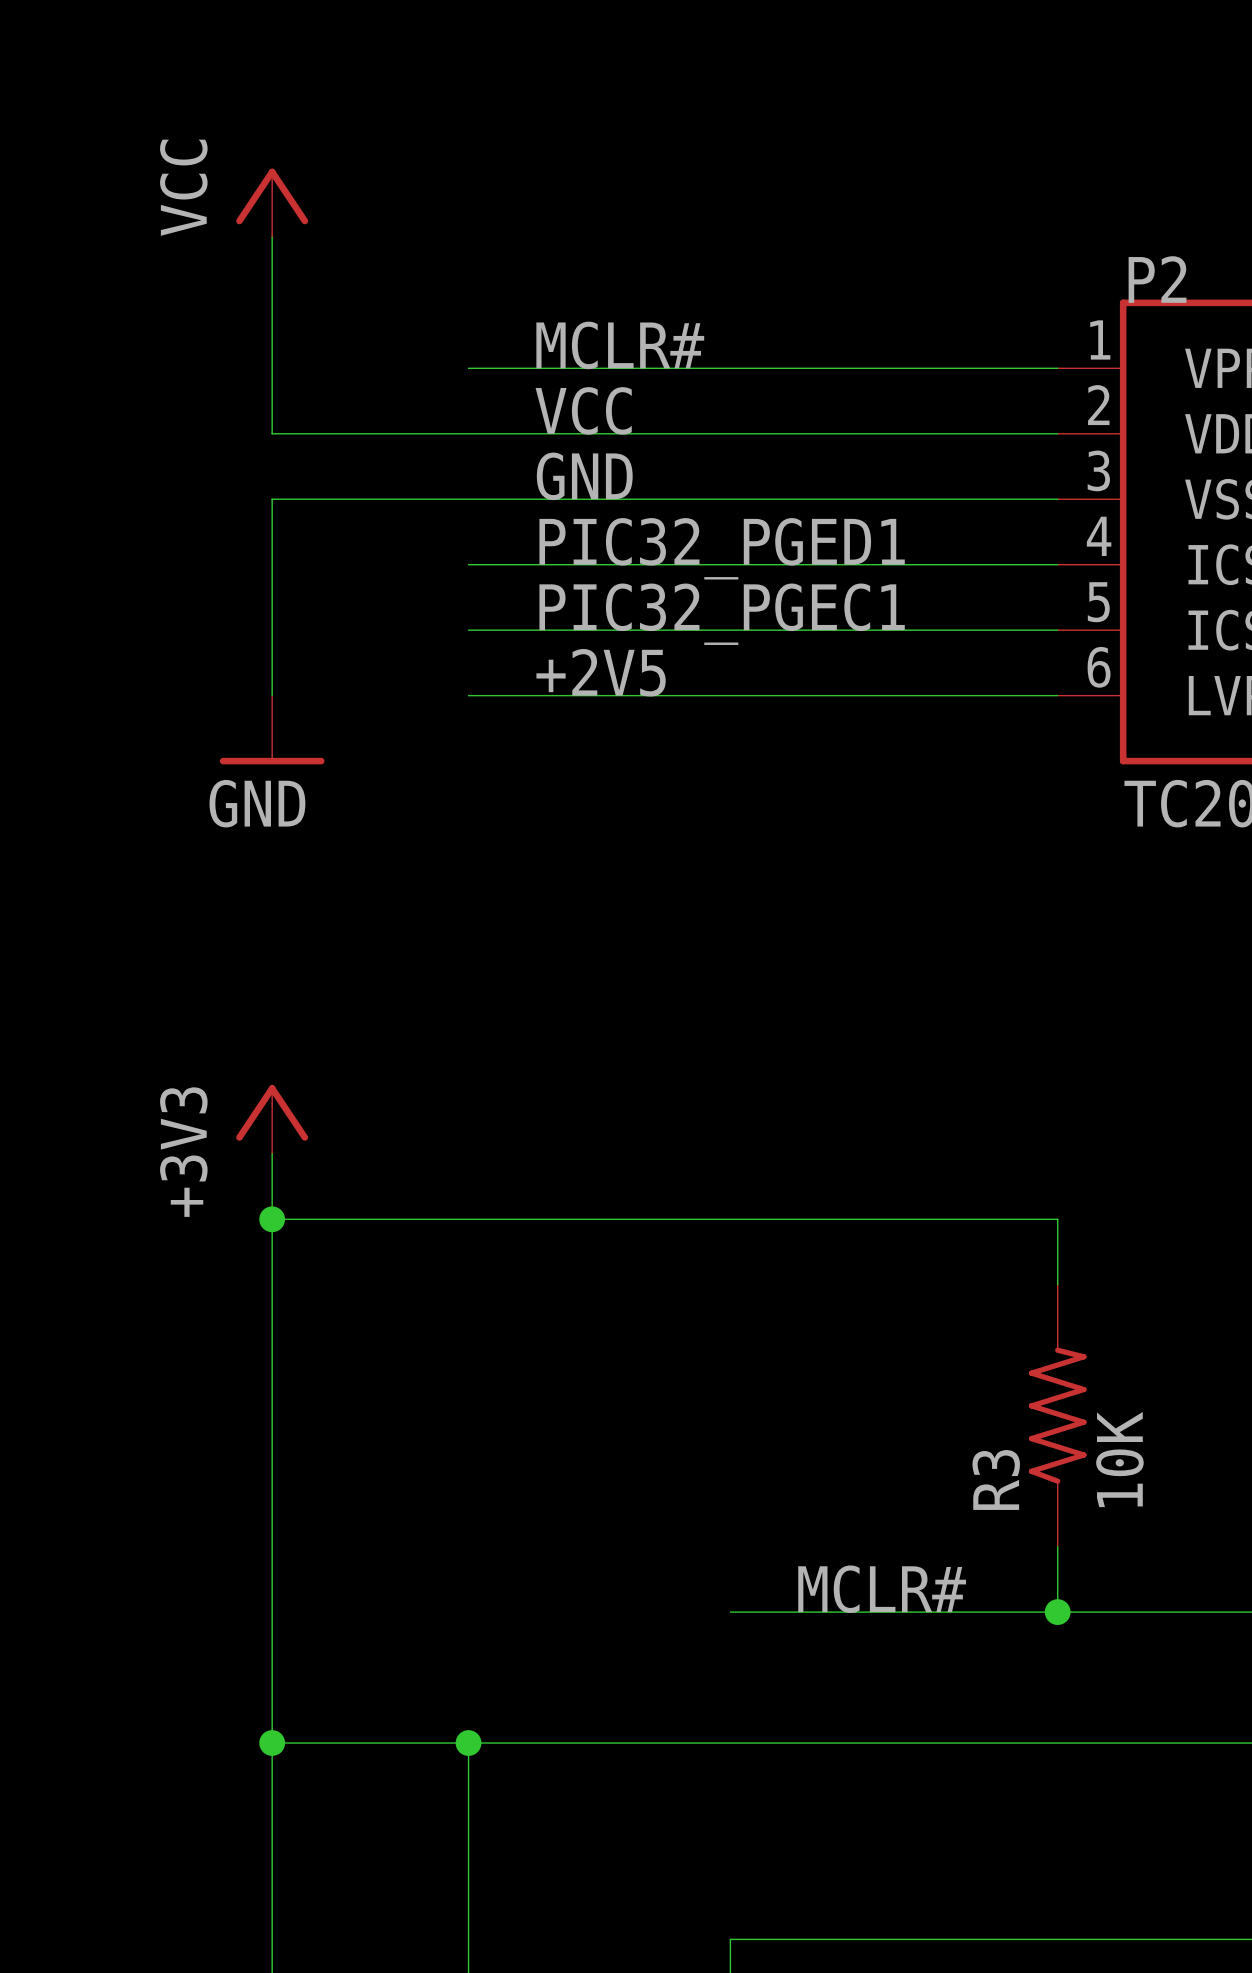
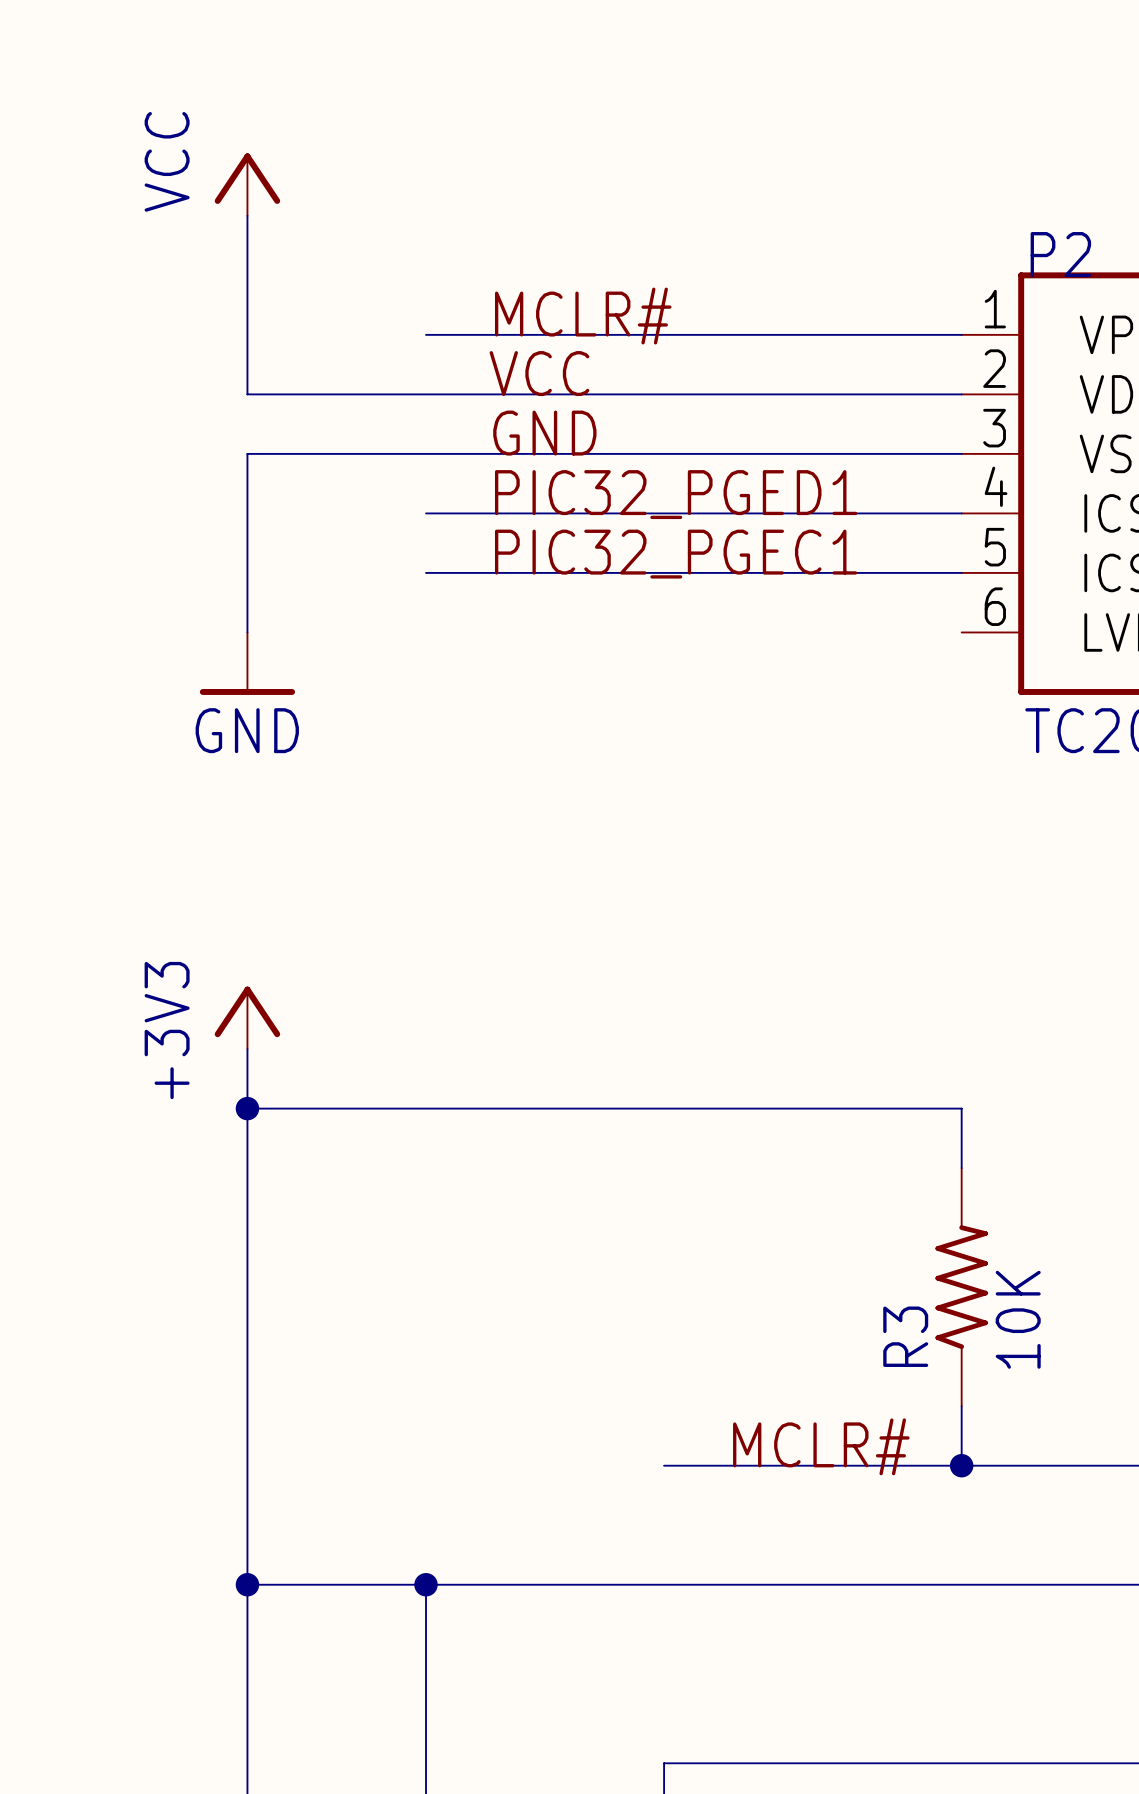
label: +2V5 (601, 672) -> none
wire: (468, 695) (1057, 695) -> none

